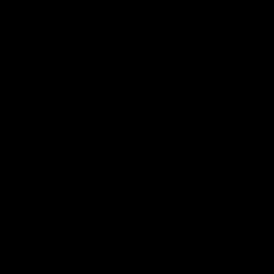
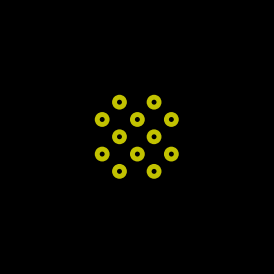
part: none -> (136, 136)

